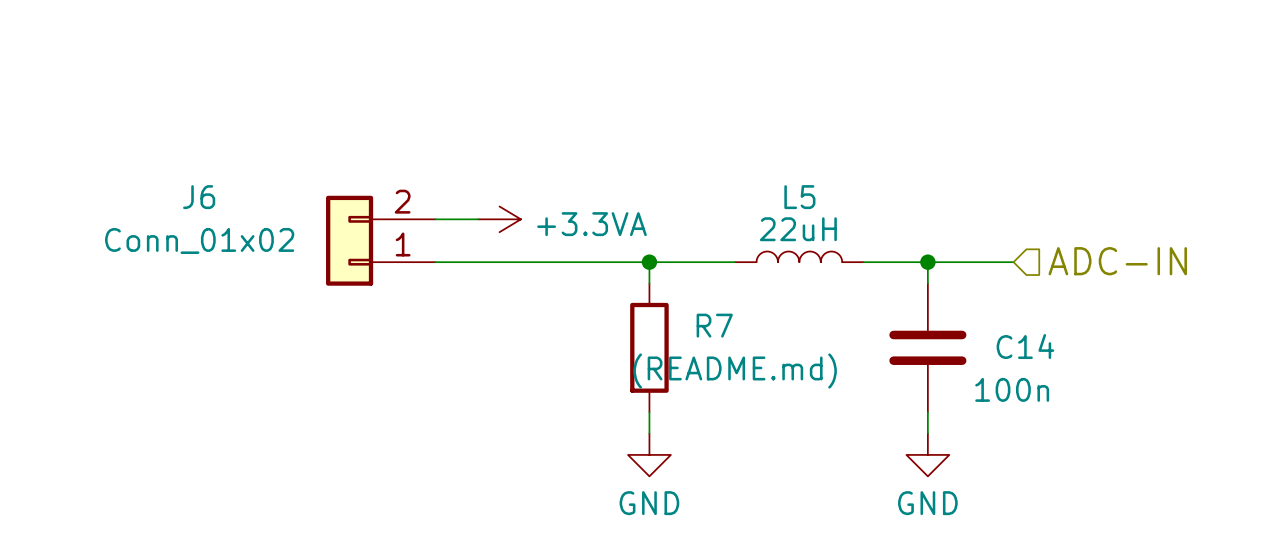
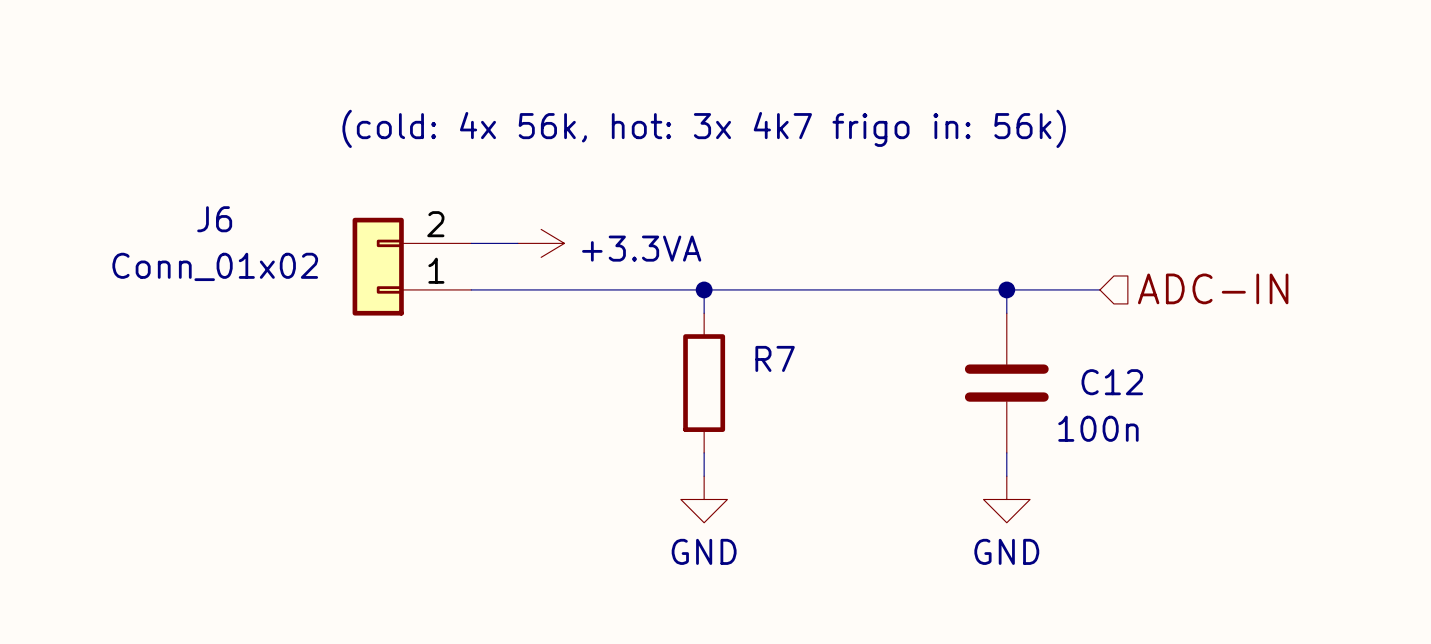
L5: 22uH (799, 256) -> none
wire: none -> (797, 289) (936, 289)
C14 name: C14 (1025, 346) -> C12 (1112, 382)
R7 value: (README.md) (735, 371) -> (cold: 4x 56k, hot: 3x 4k7 frigo in: 56k) (704, 128)

